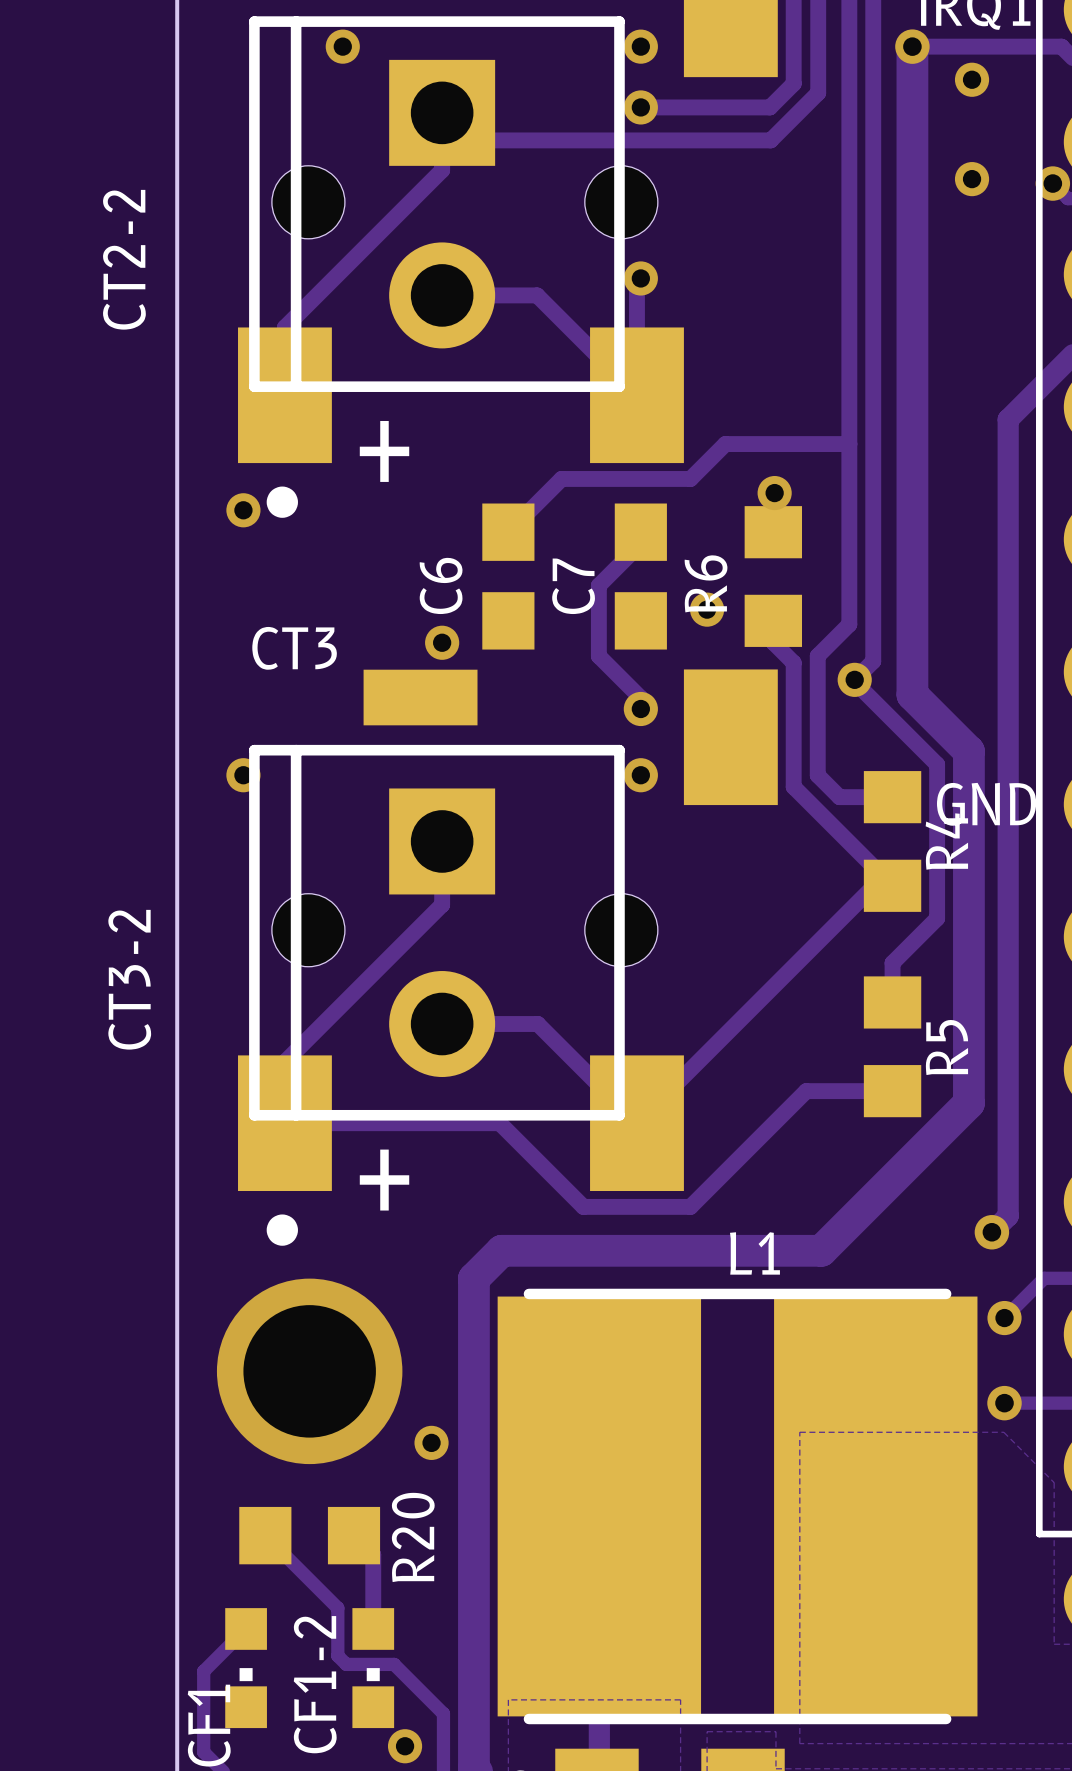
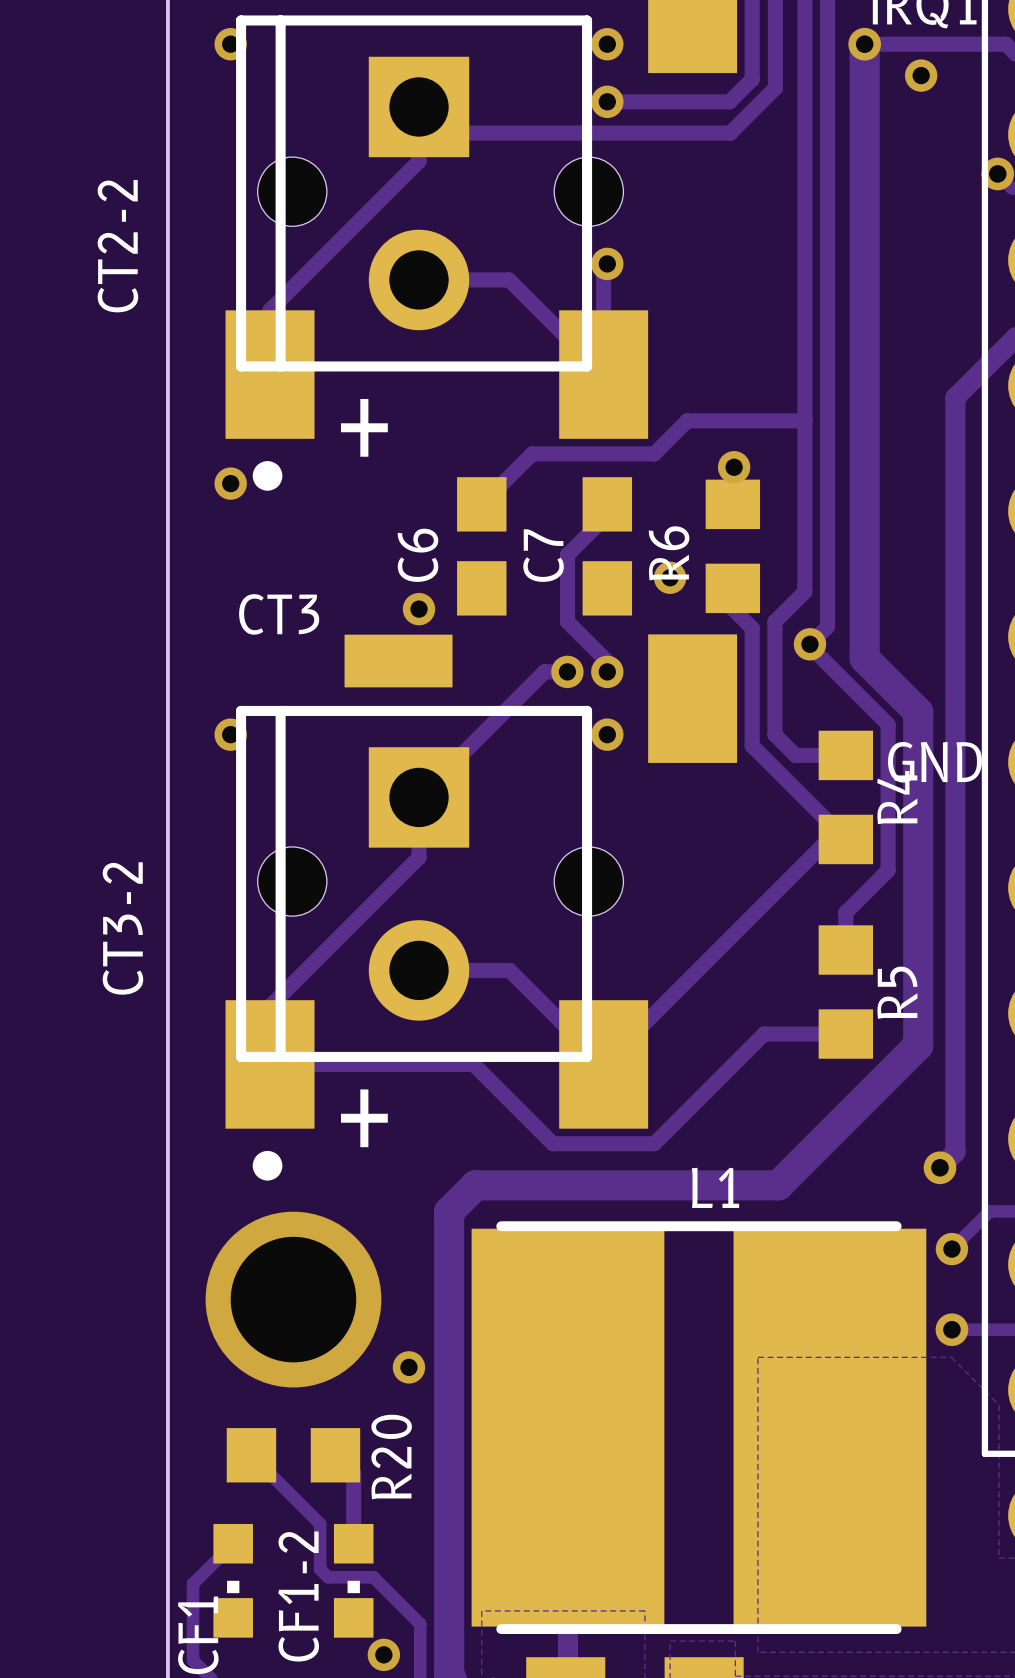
via position: (342, 46) -> (230, 44)
via: (972, 179) -> none
track: none -> (567, 671) (544, 671) (419, 797)
via: none -> (567, 671)

